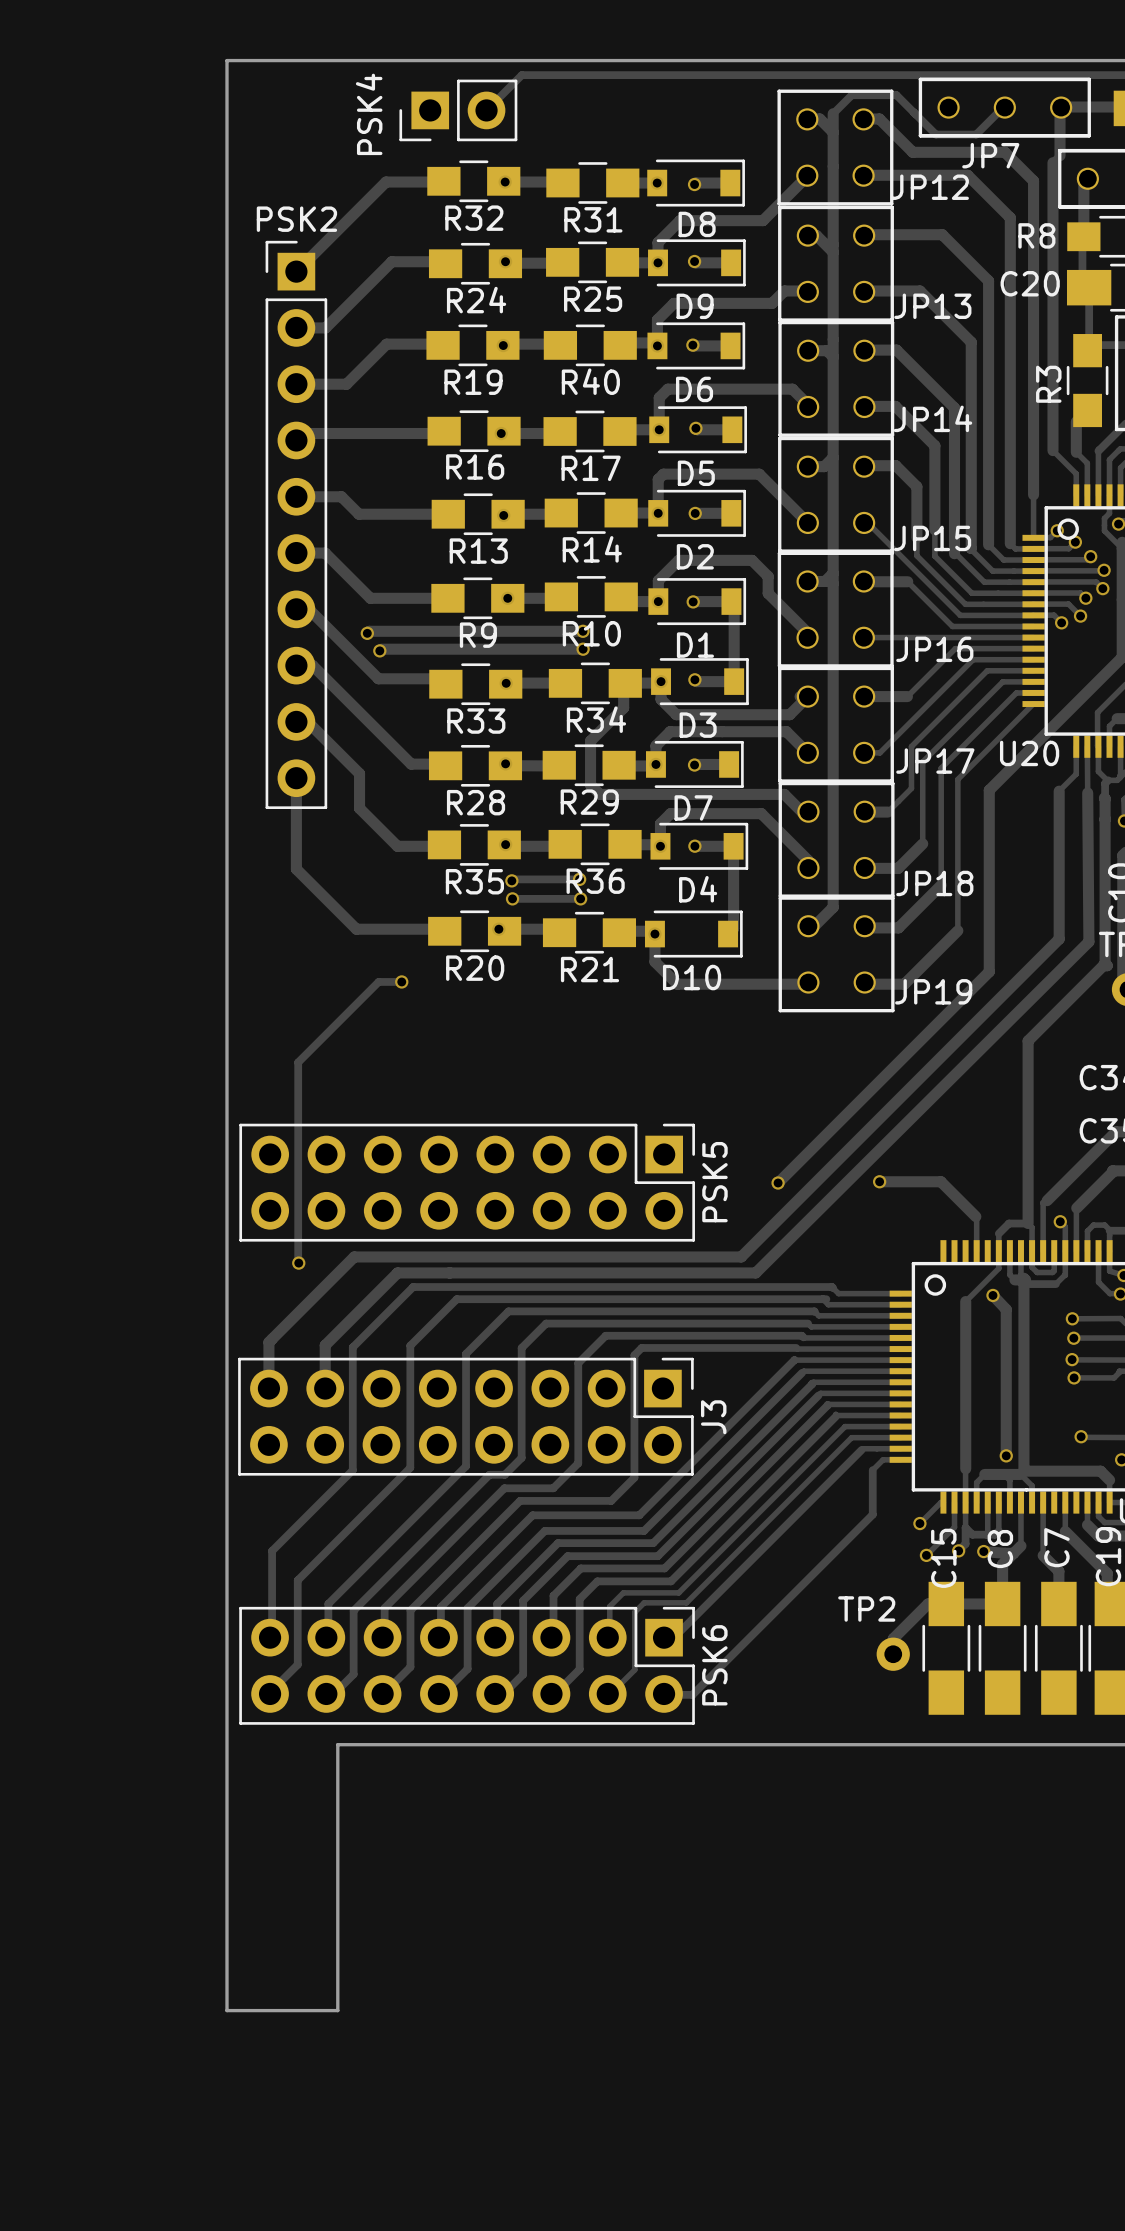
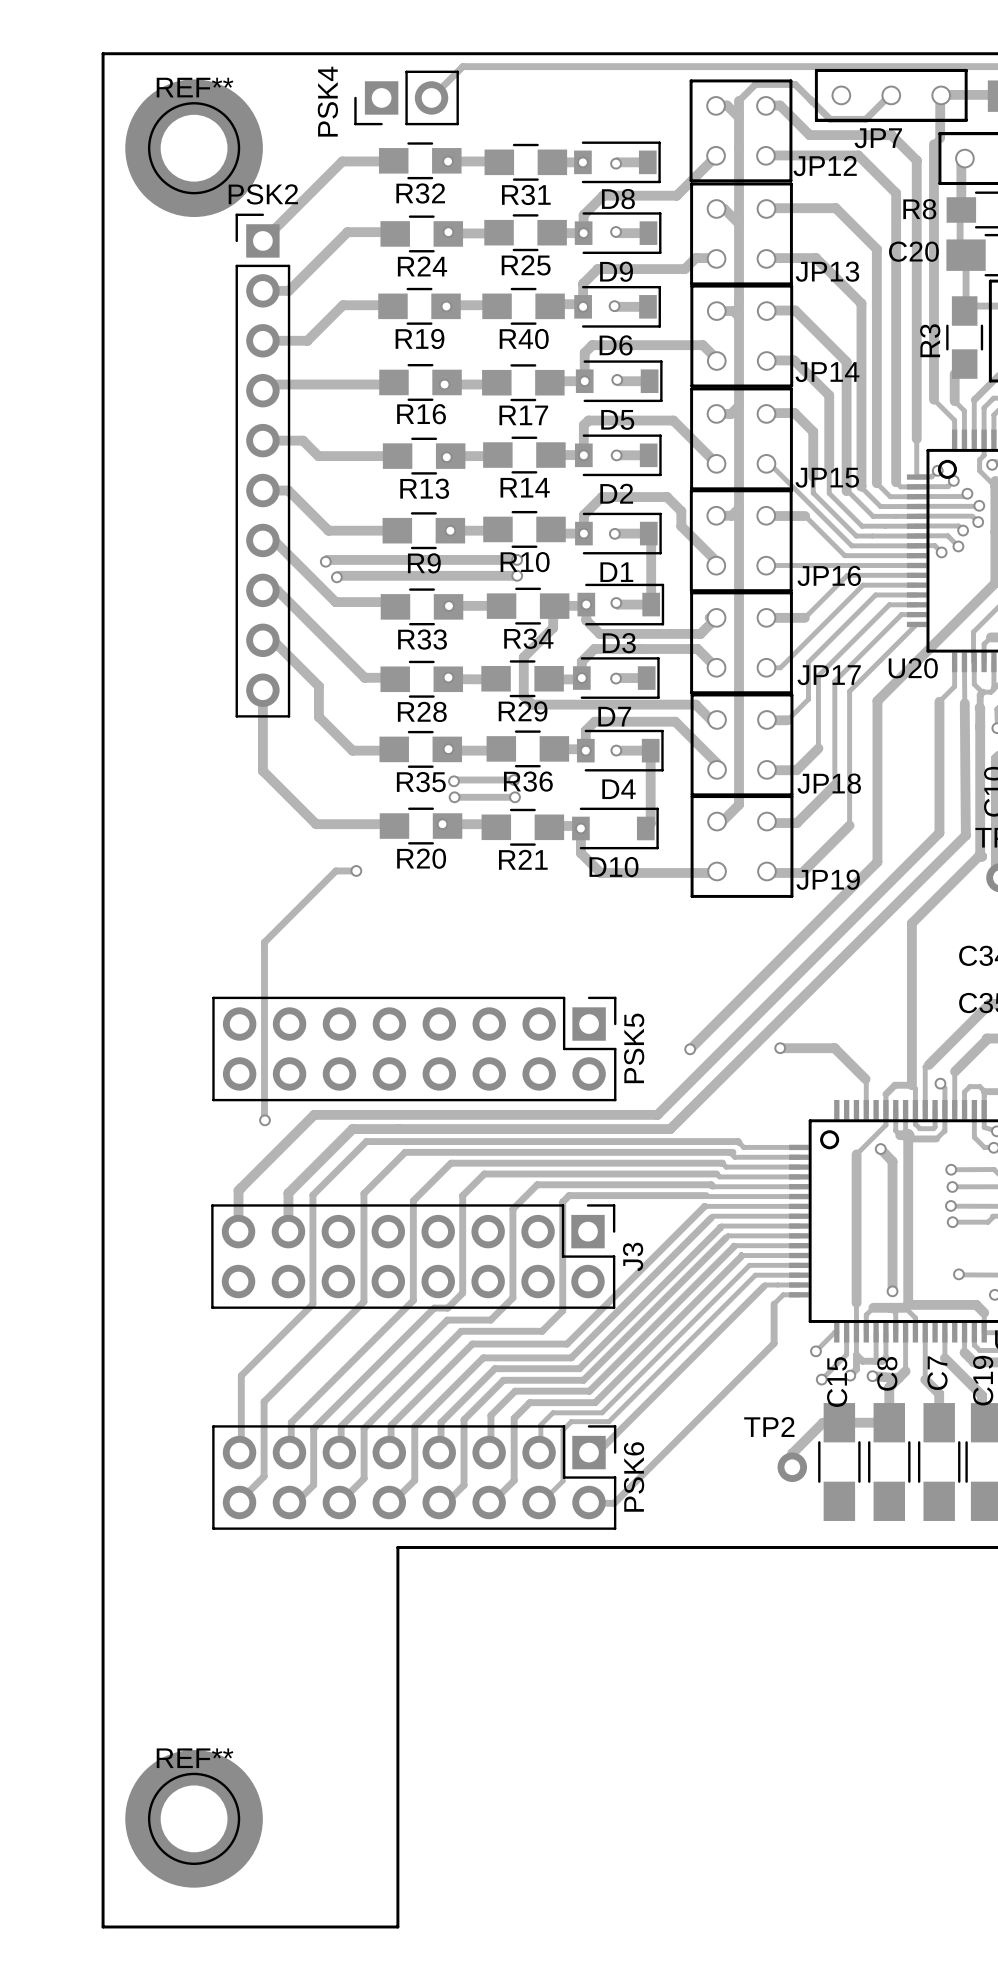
board edge: (227, 60) (227, 2010) (337, 2010) (337, 1744) (448, 1744) -> (201, 53) (103, 53) (103, 1926) (397, 1926) (397, 1547)
REF**: none -> (194, 148)
REF**: none -> (194, 1818)

